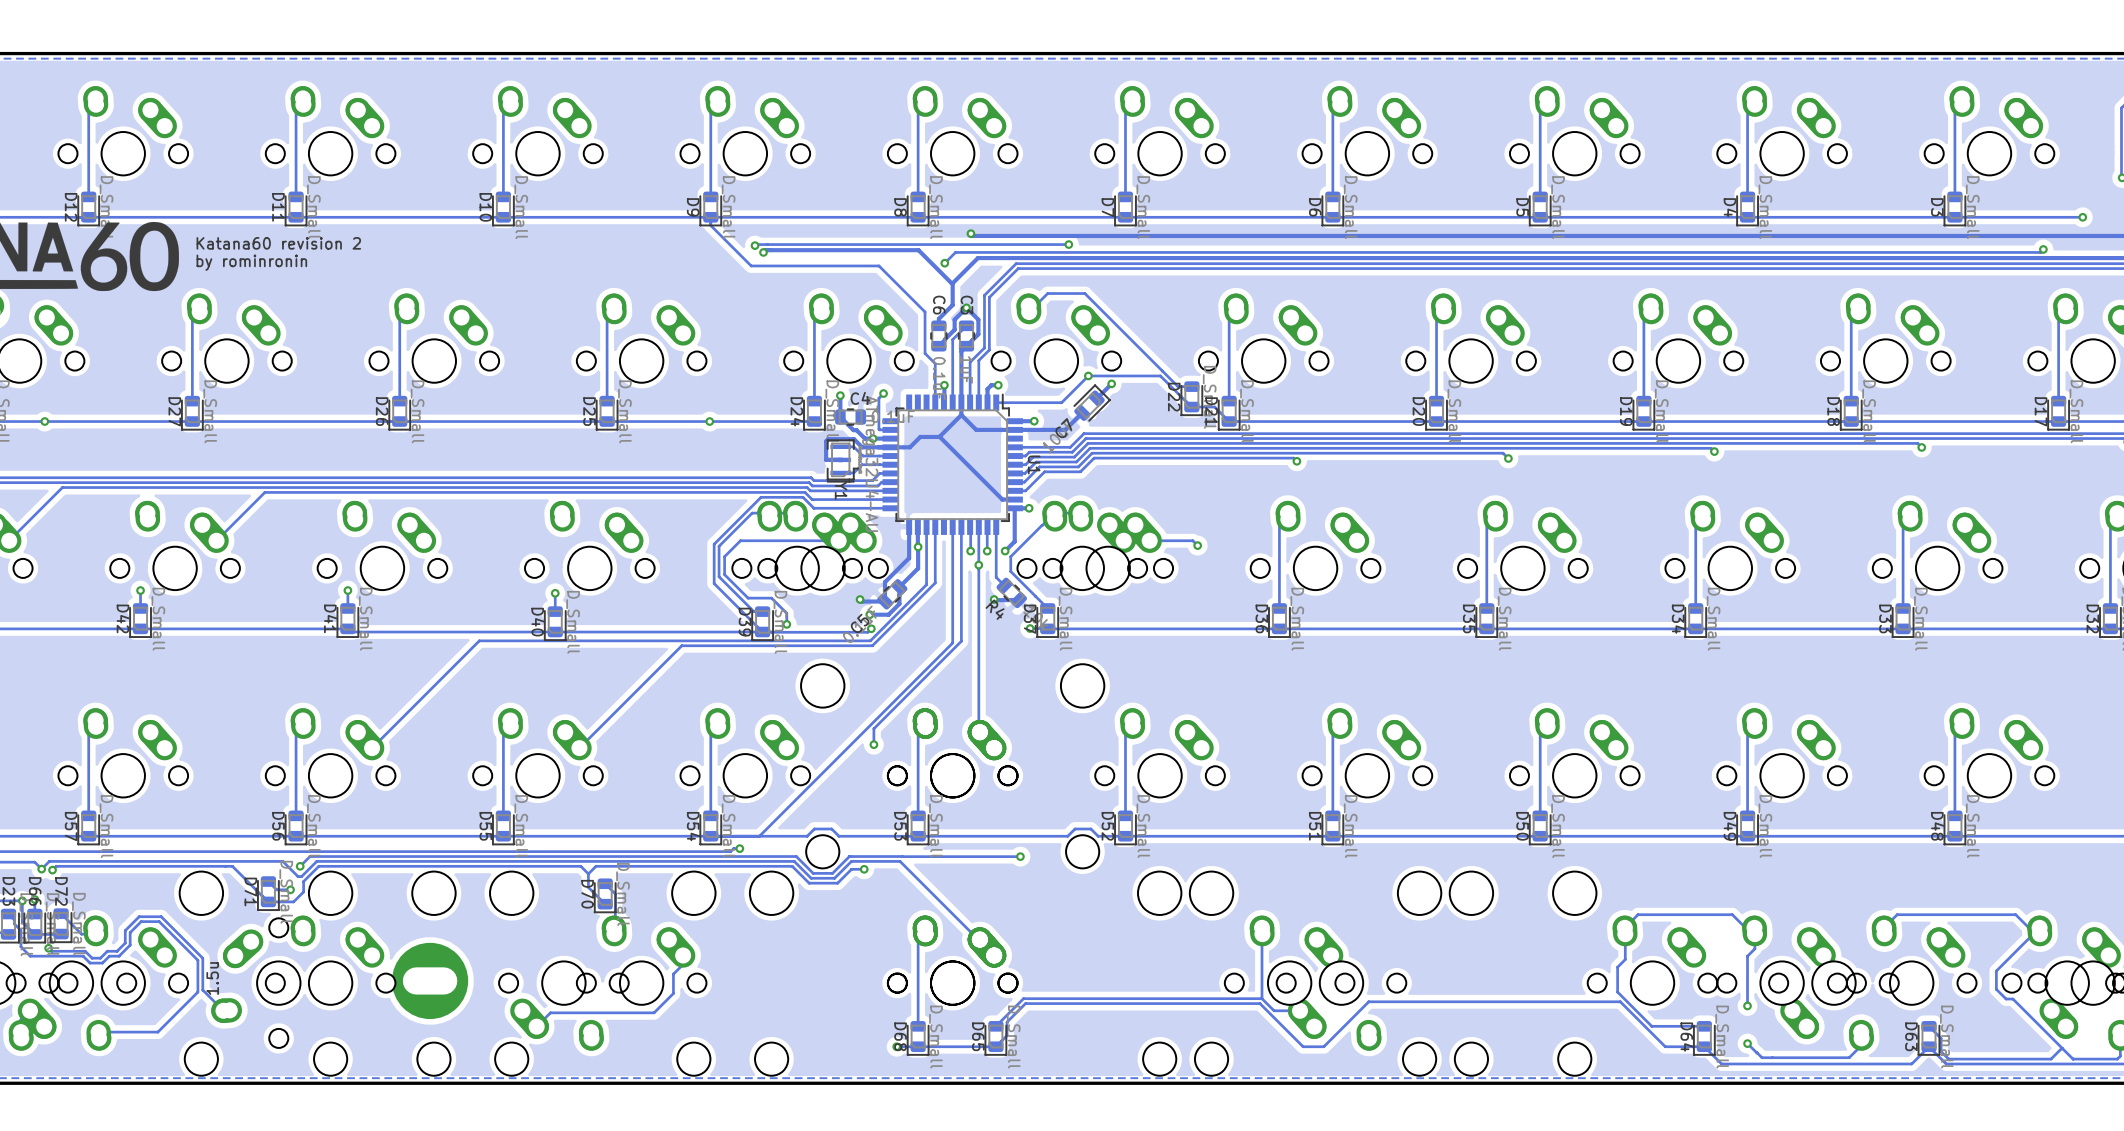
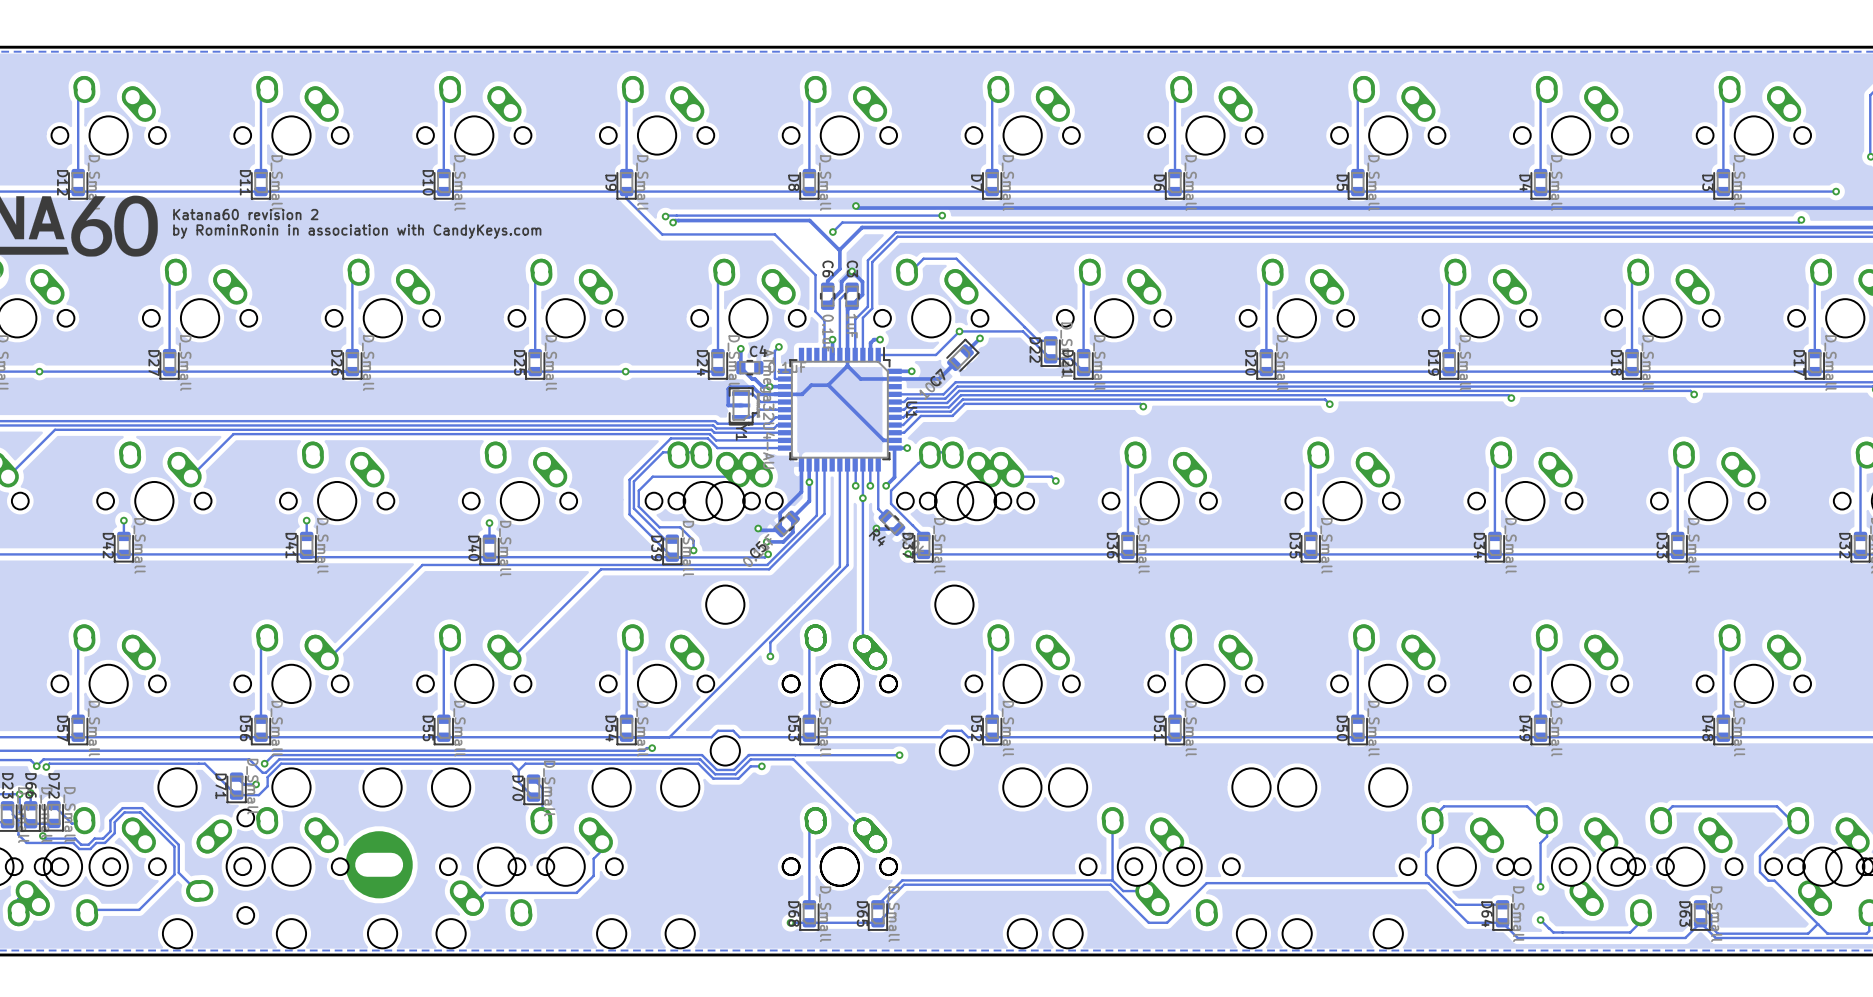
text: by rominronin (251, 262) -> by RominRonin in association with CandyKeys.com (357, 231)
text: 1.5u (212, 978) -> none

